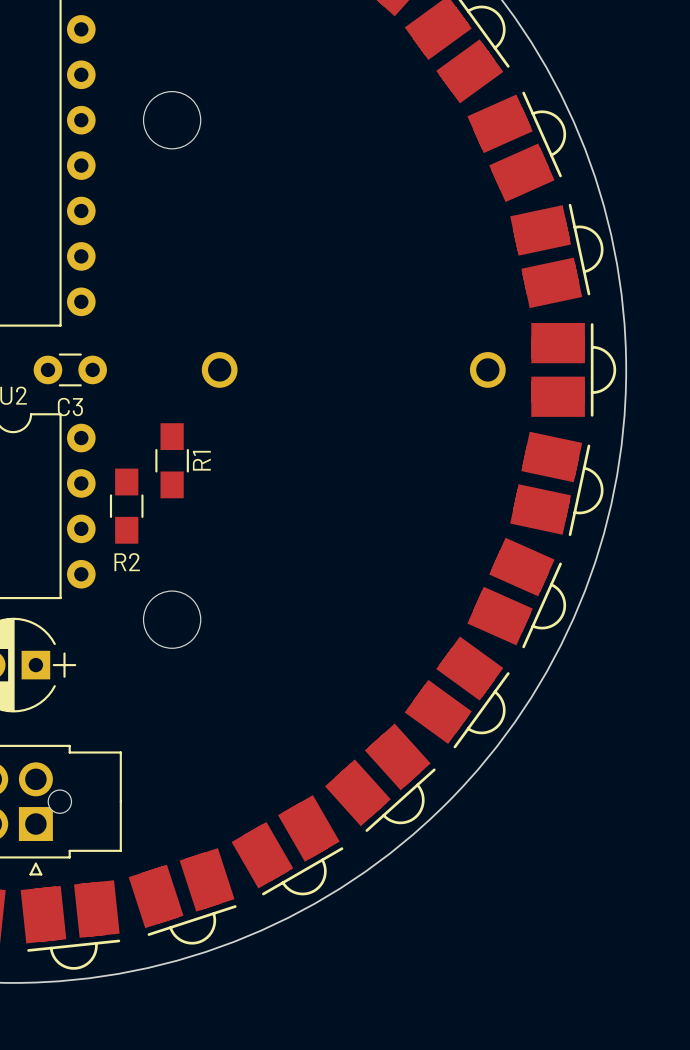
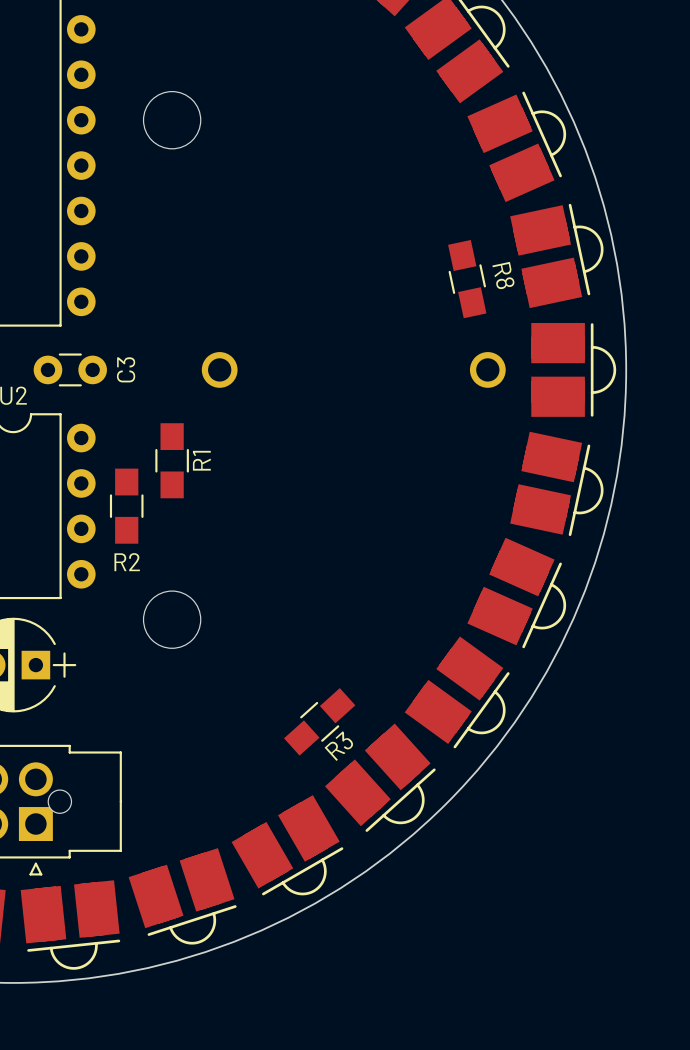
R8: none -> (467, 279)
C3 name rotation: 0° (70, 407) -> 90° counterclockwise (126, 369)
C3 name position: C3 (70, 407) -> C3 (126, 369)
R3: none -> (319, 721)

